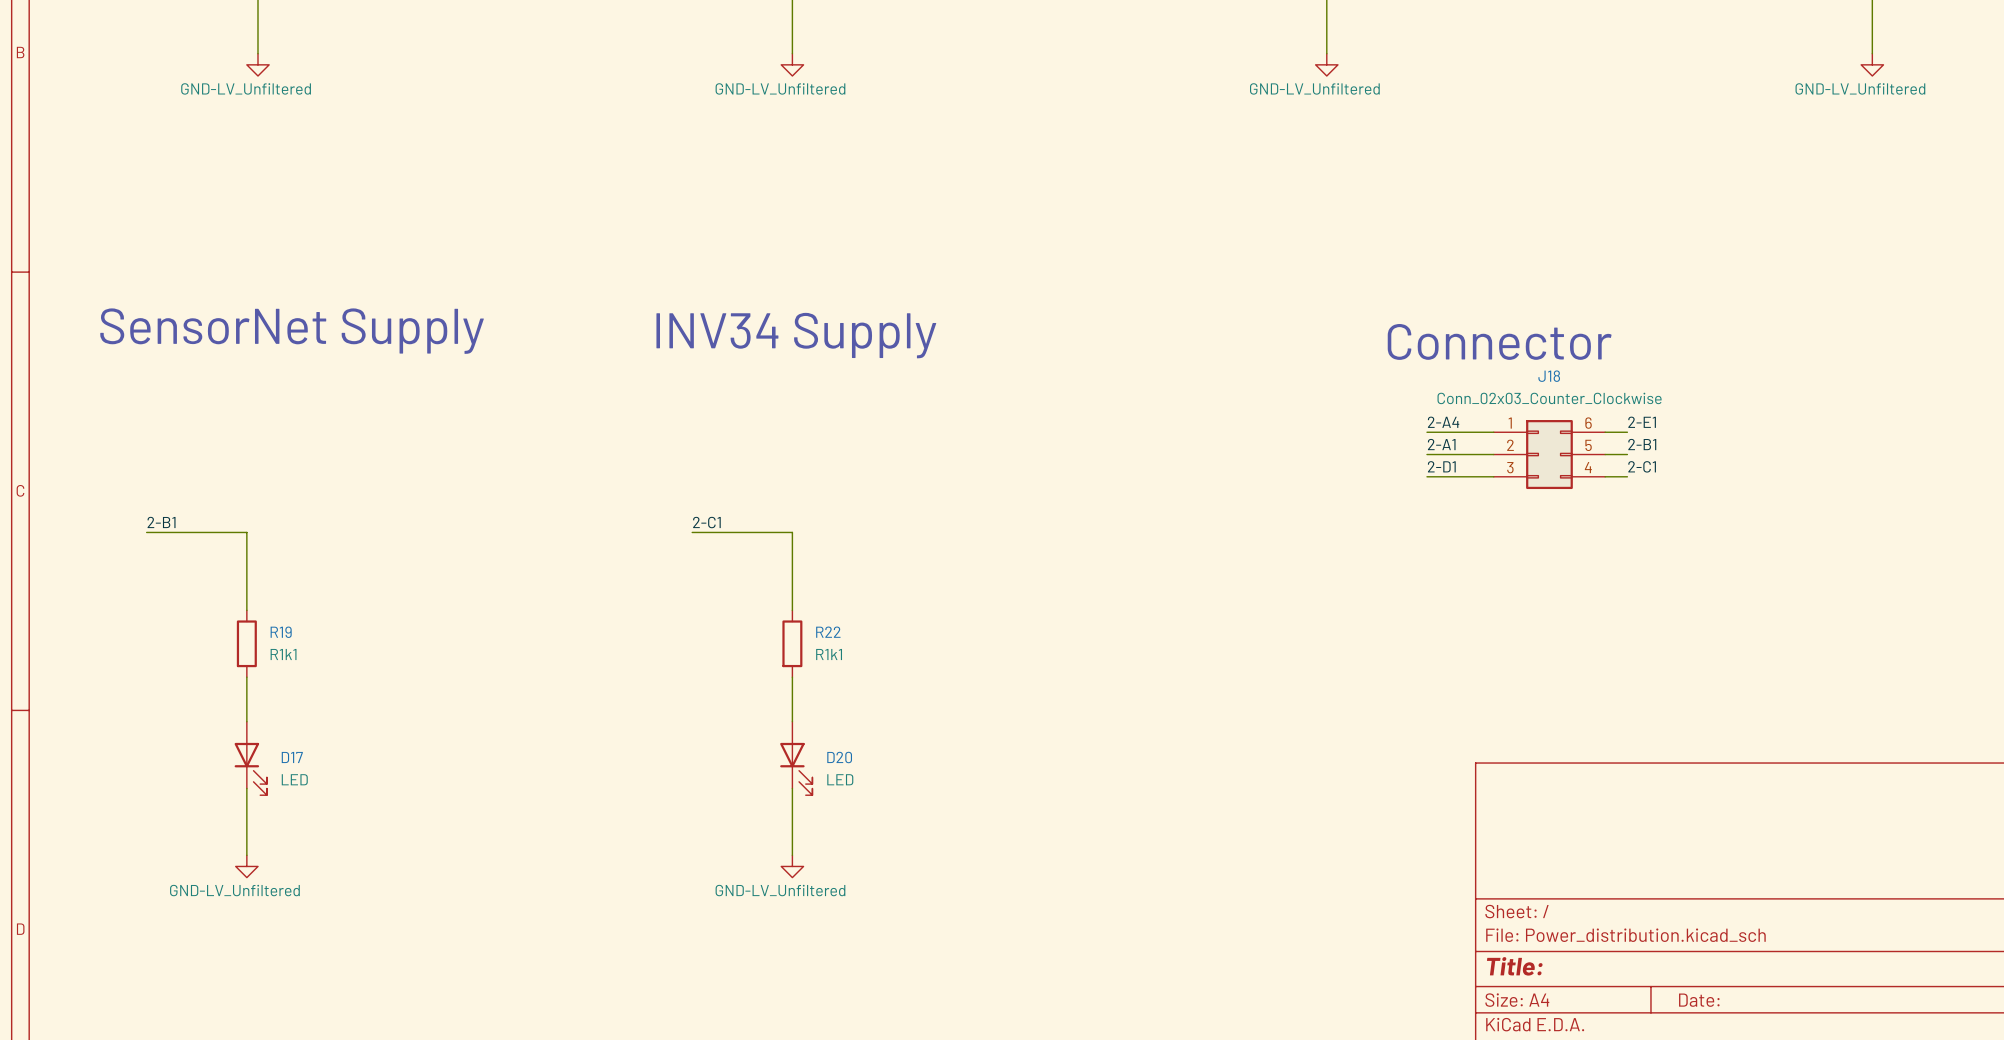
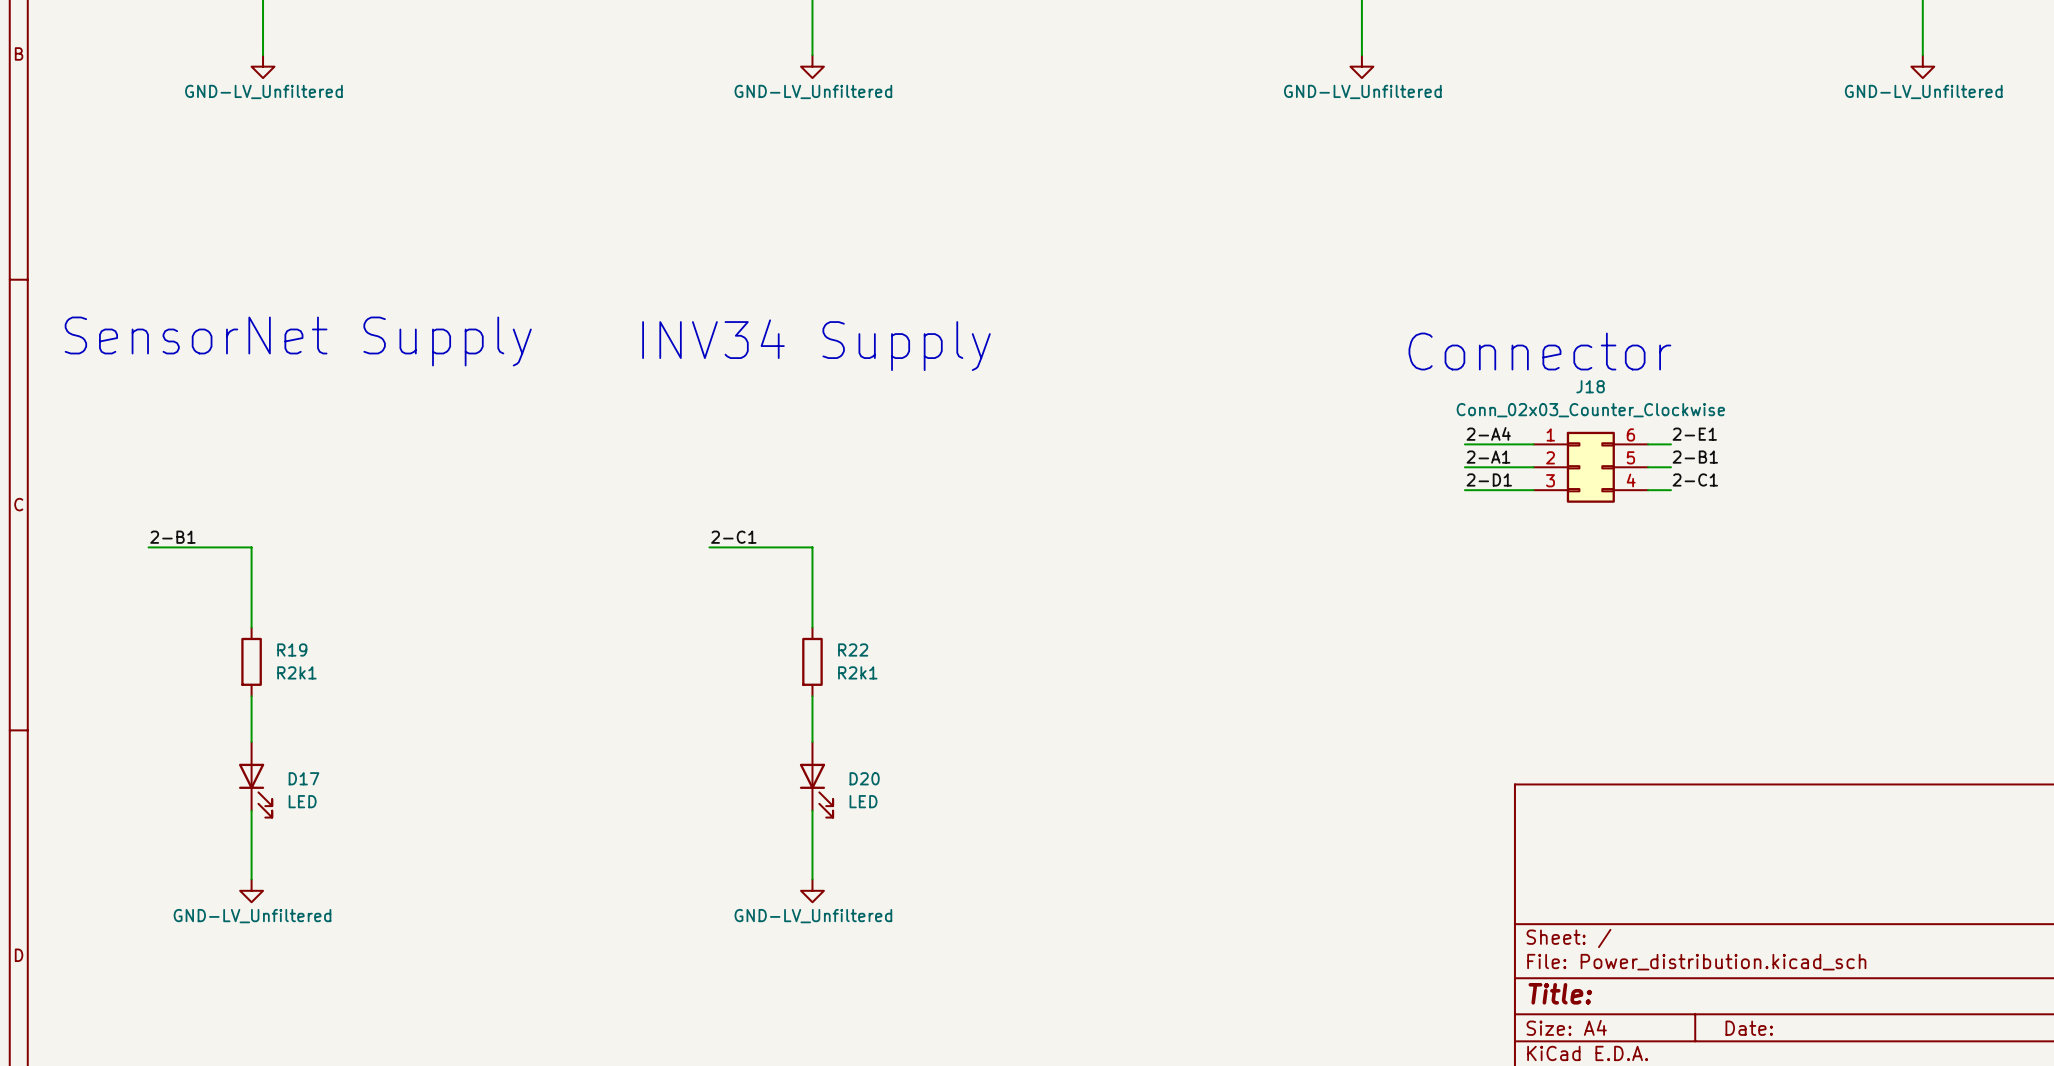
R19 value: R1k1 (283, 654) -> R2k1 (296, 672)
R22 value: R1k1 (829, 654) -> R2k1 (857, 672)

